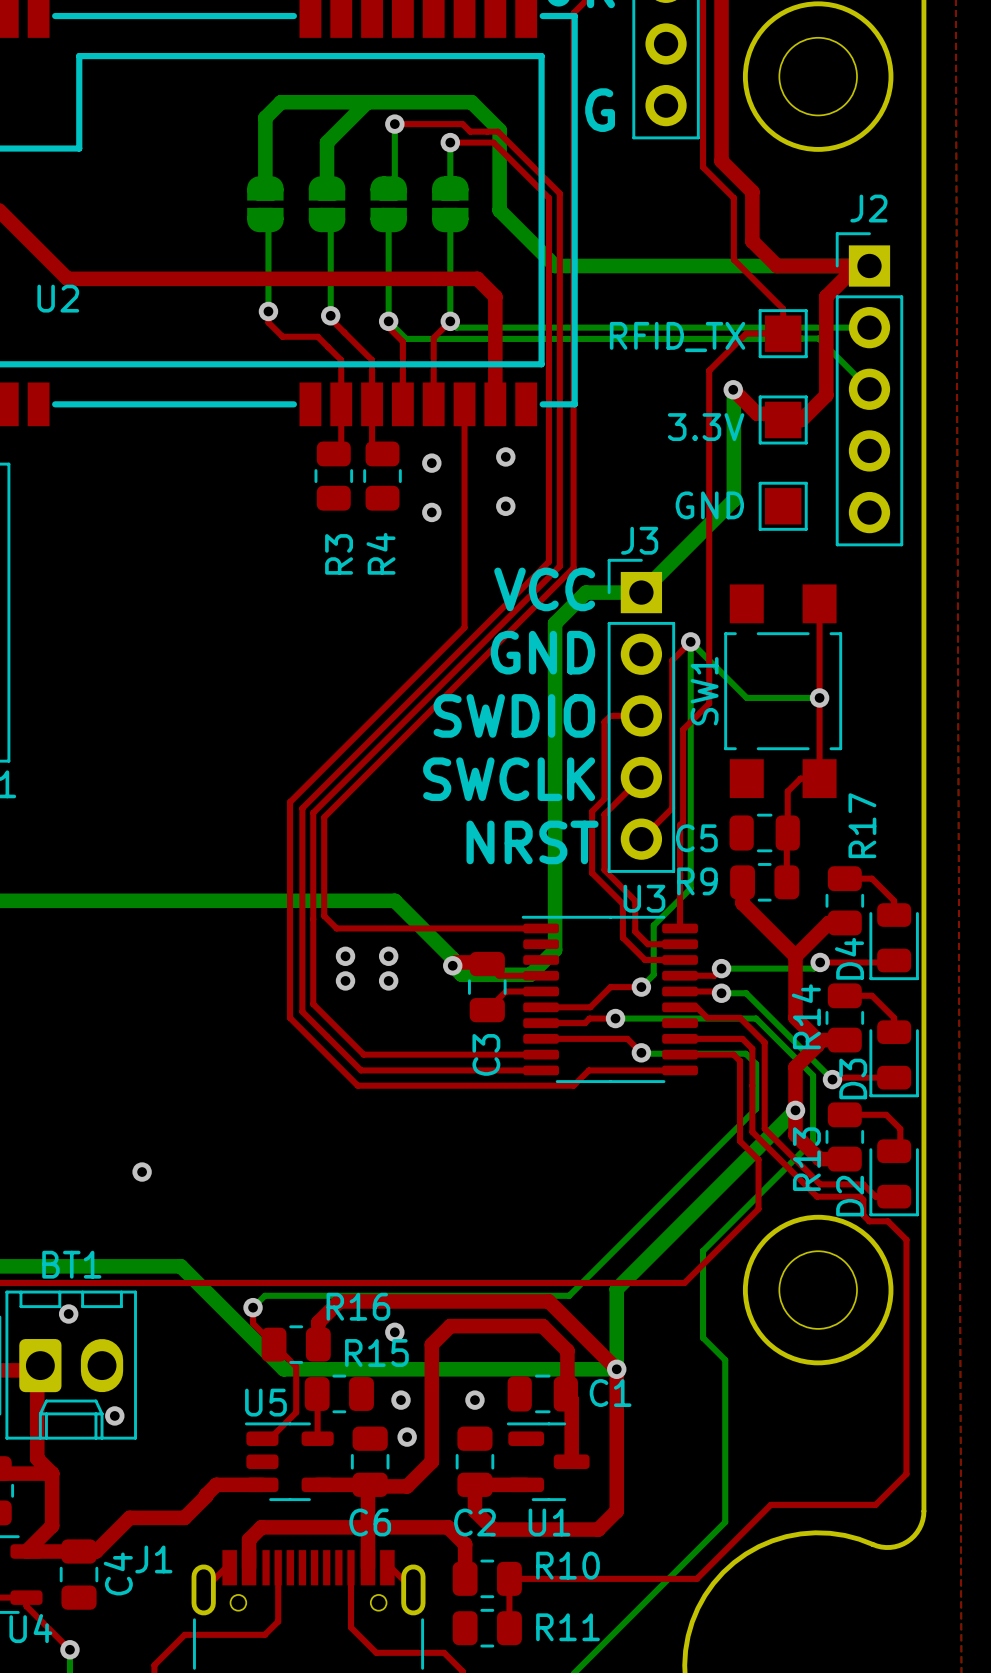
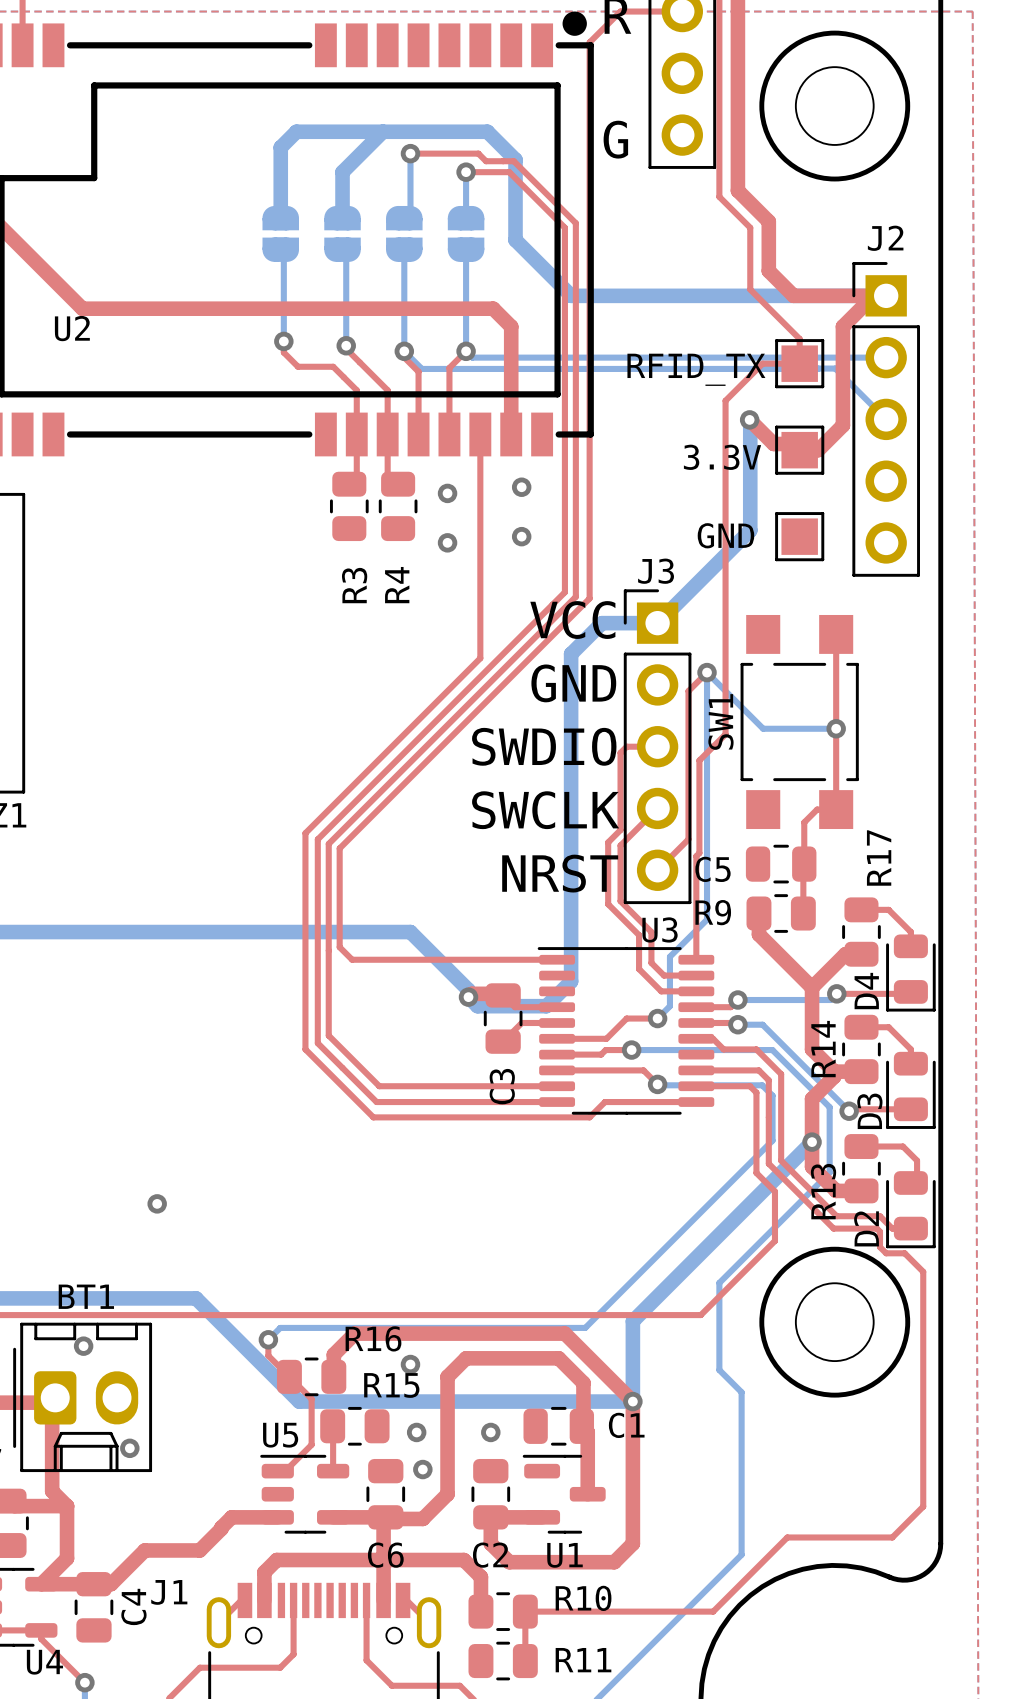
via: (345, 956) -> none
via: (388, 956) -> none
via: (345, 980) -> none
via: (388, 980) -> none

